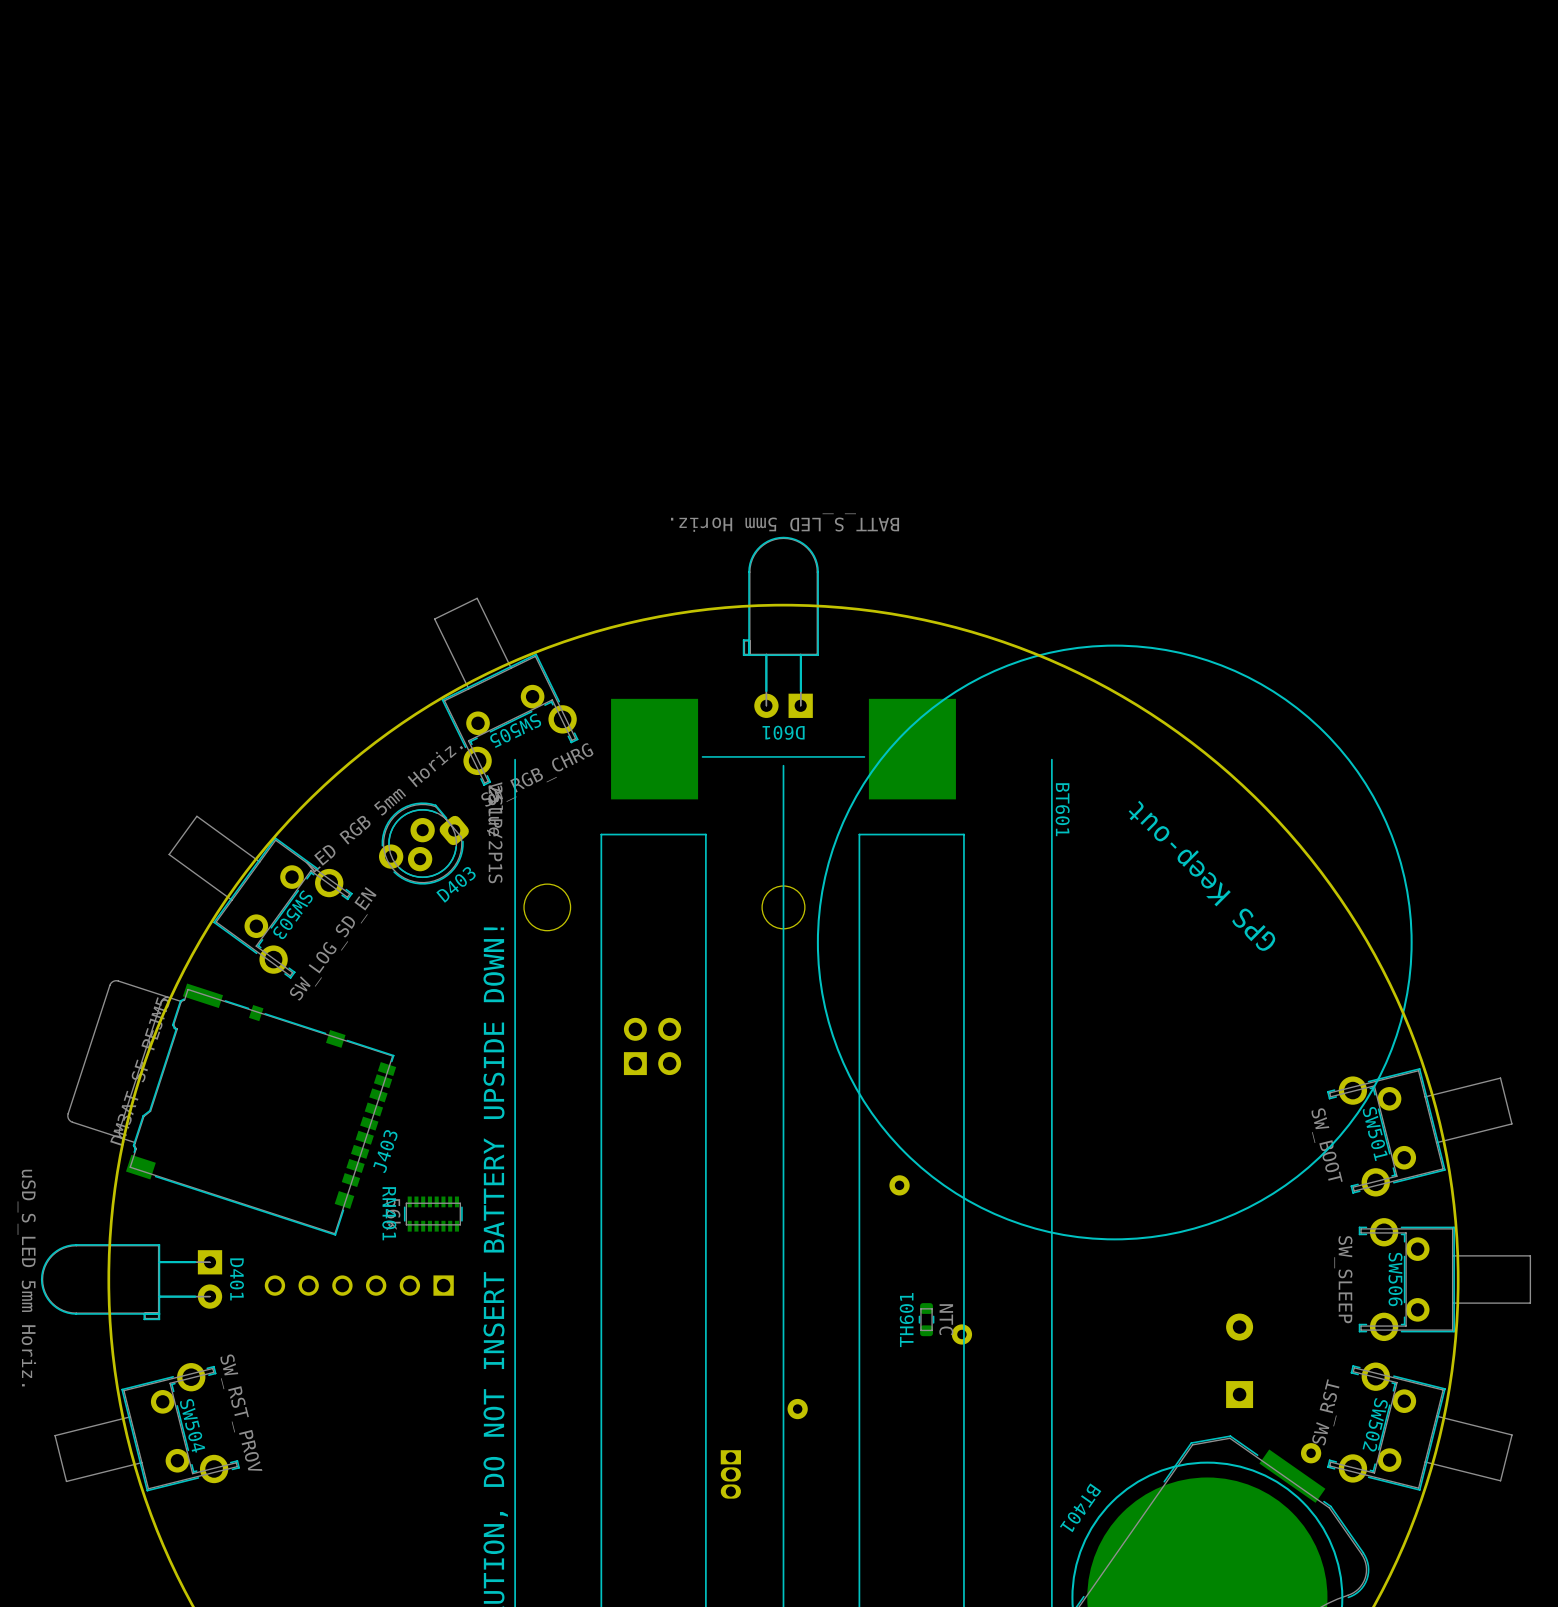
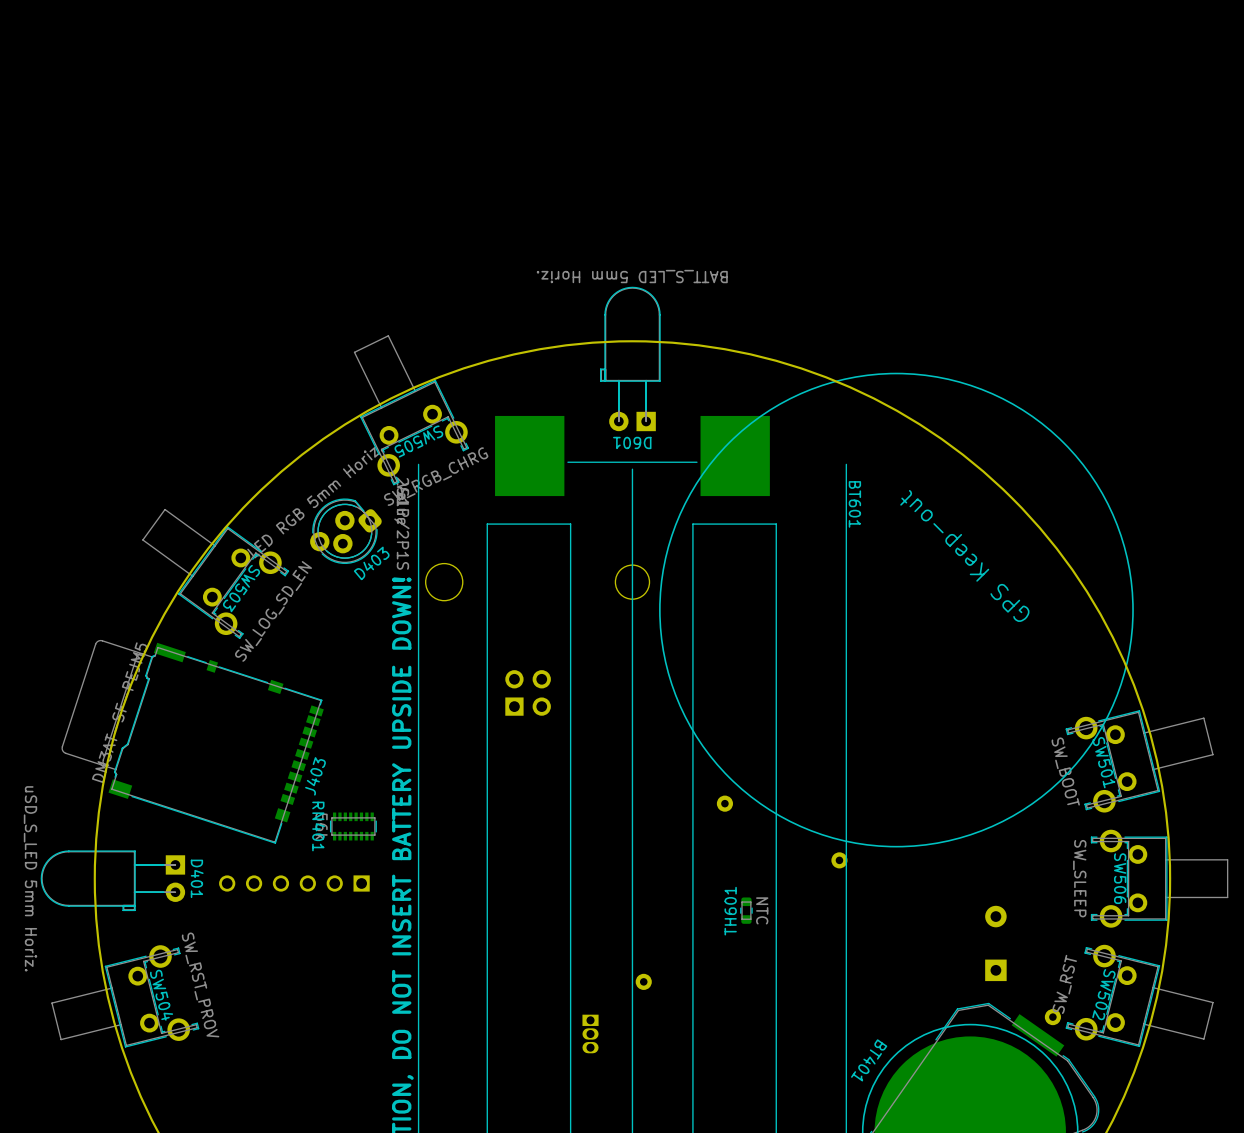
part position: (961, 1334) -> (839, 860)

